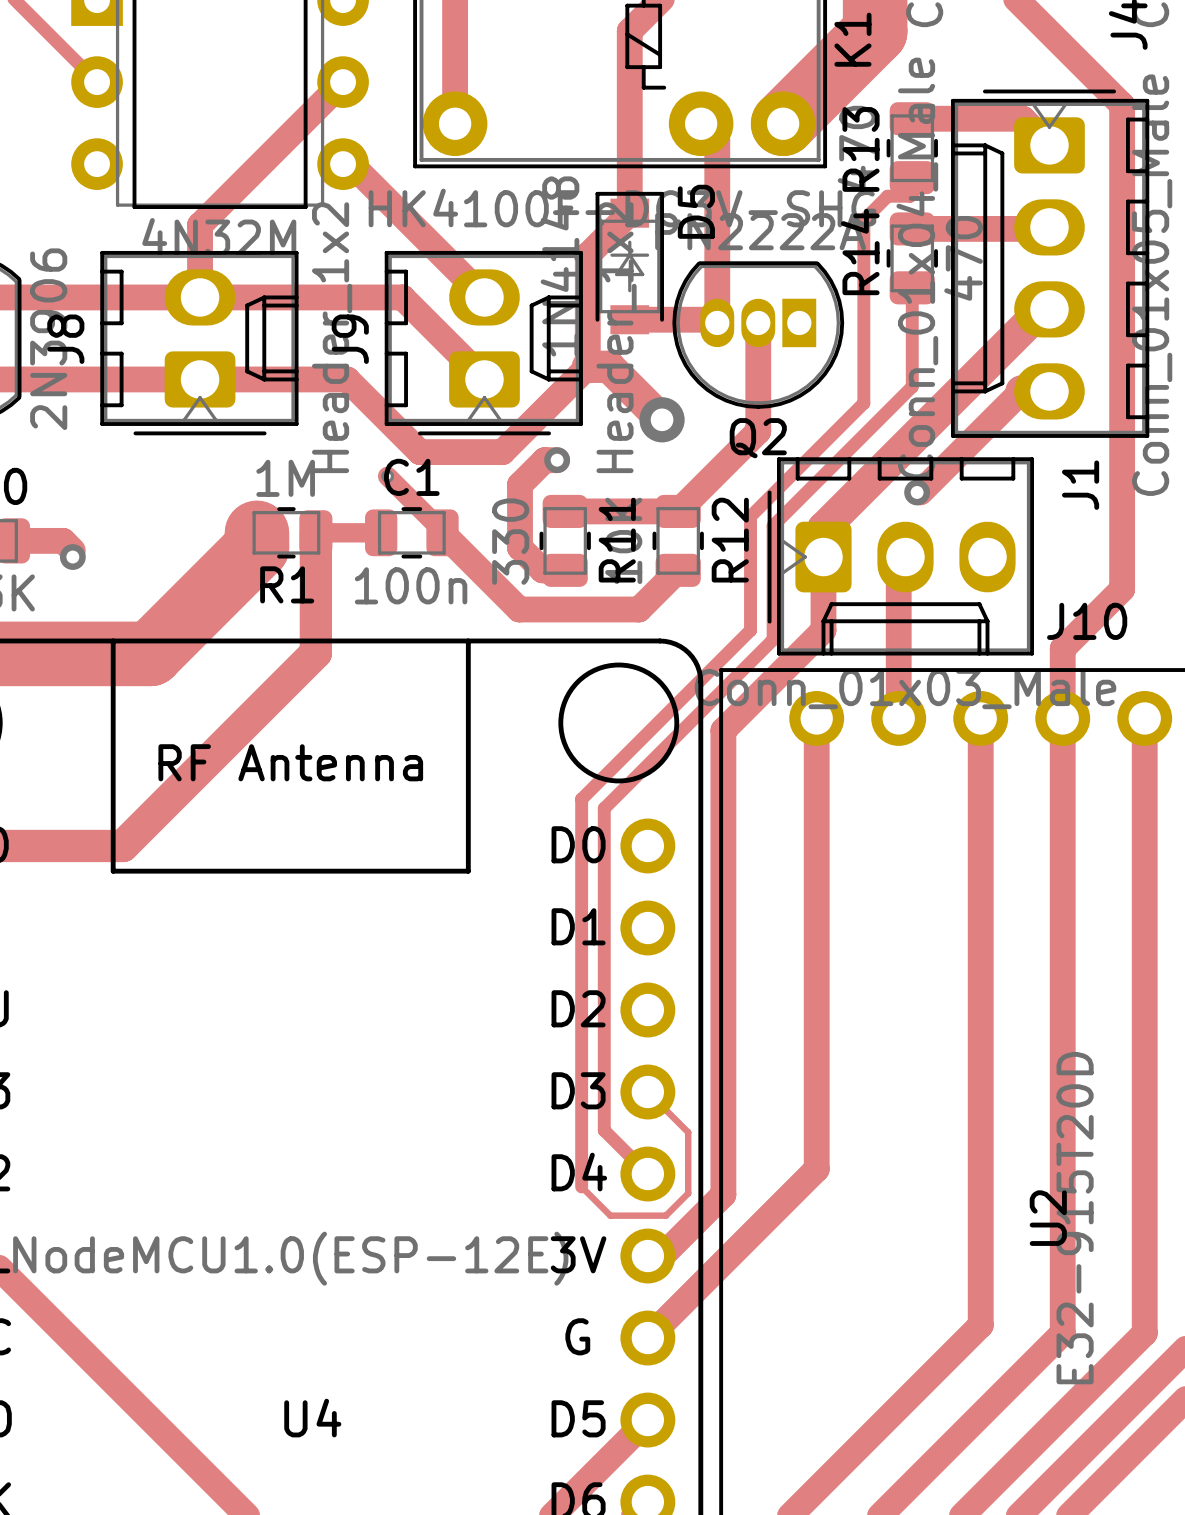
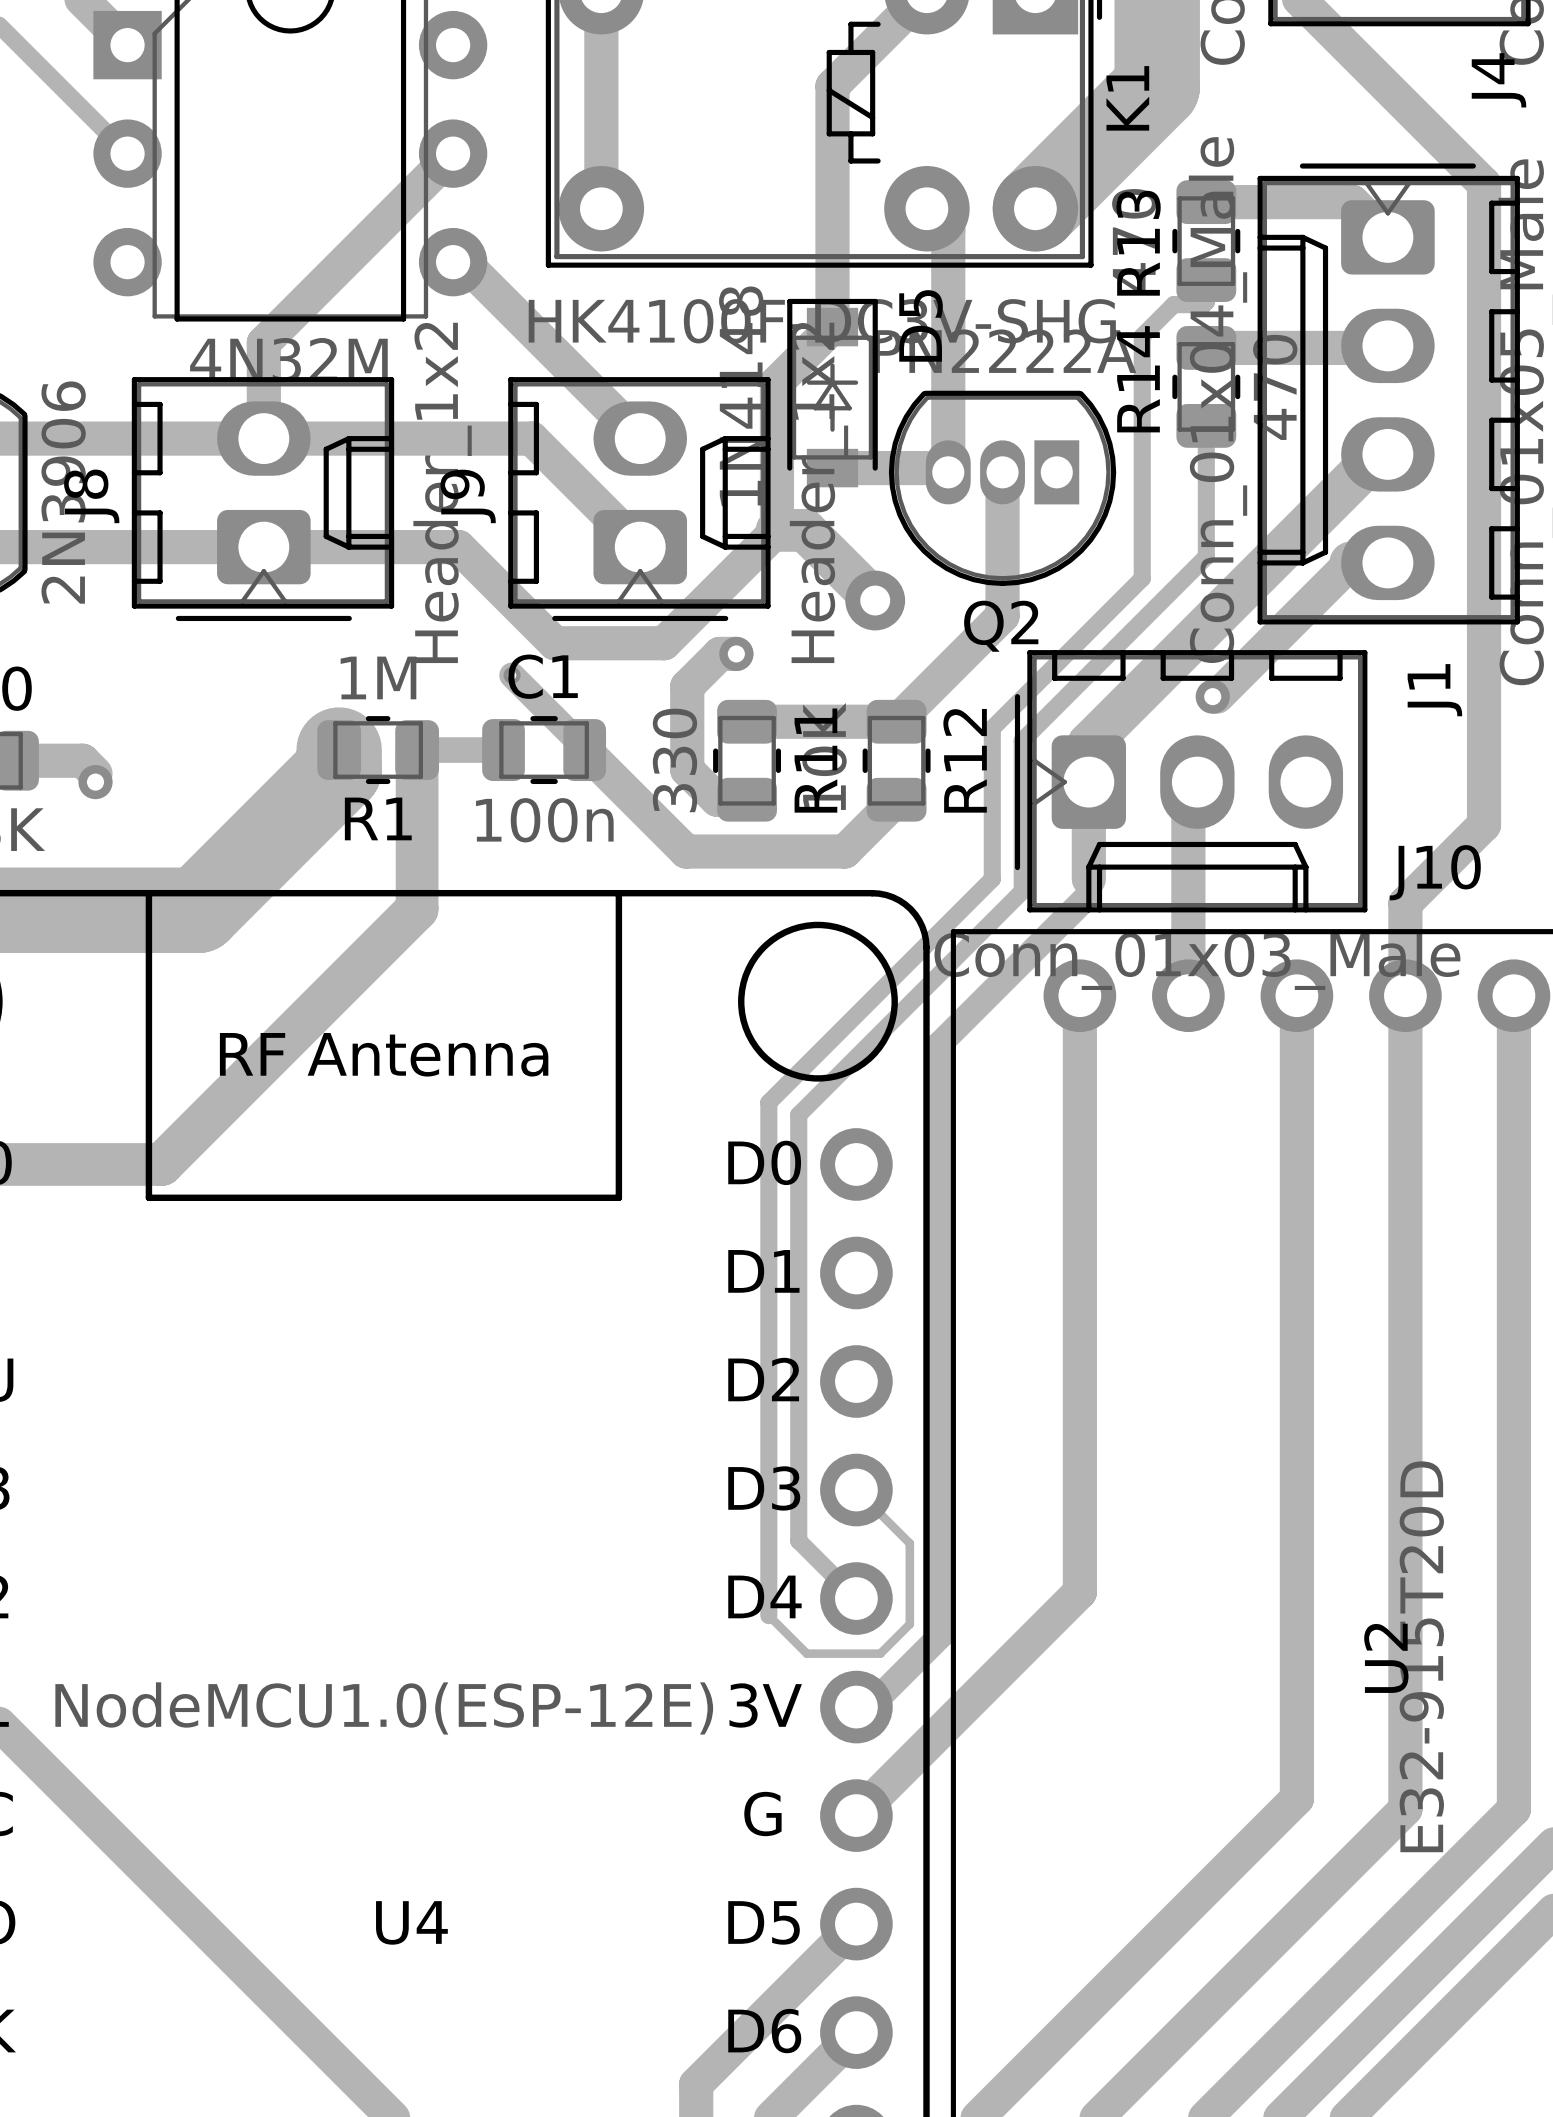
track: (823, 630) (723, 730) (723, 1194) (662, 1256) (647, 1256) -> (1088, 879) (1088, 895) (939, 1044) (939, 1636) (869, 1707)

